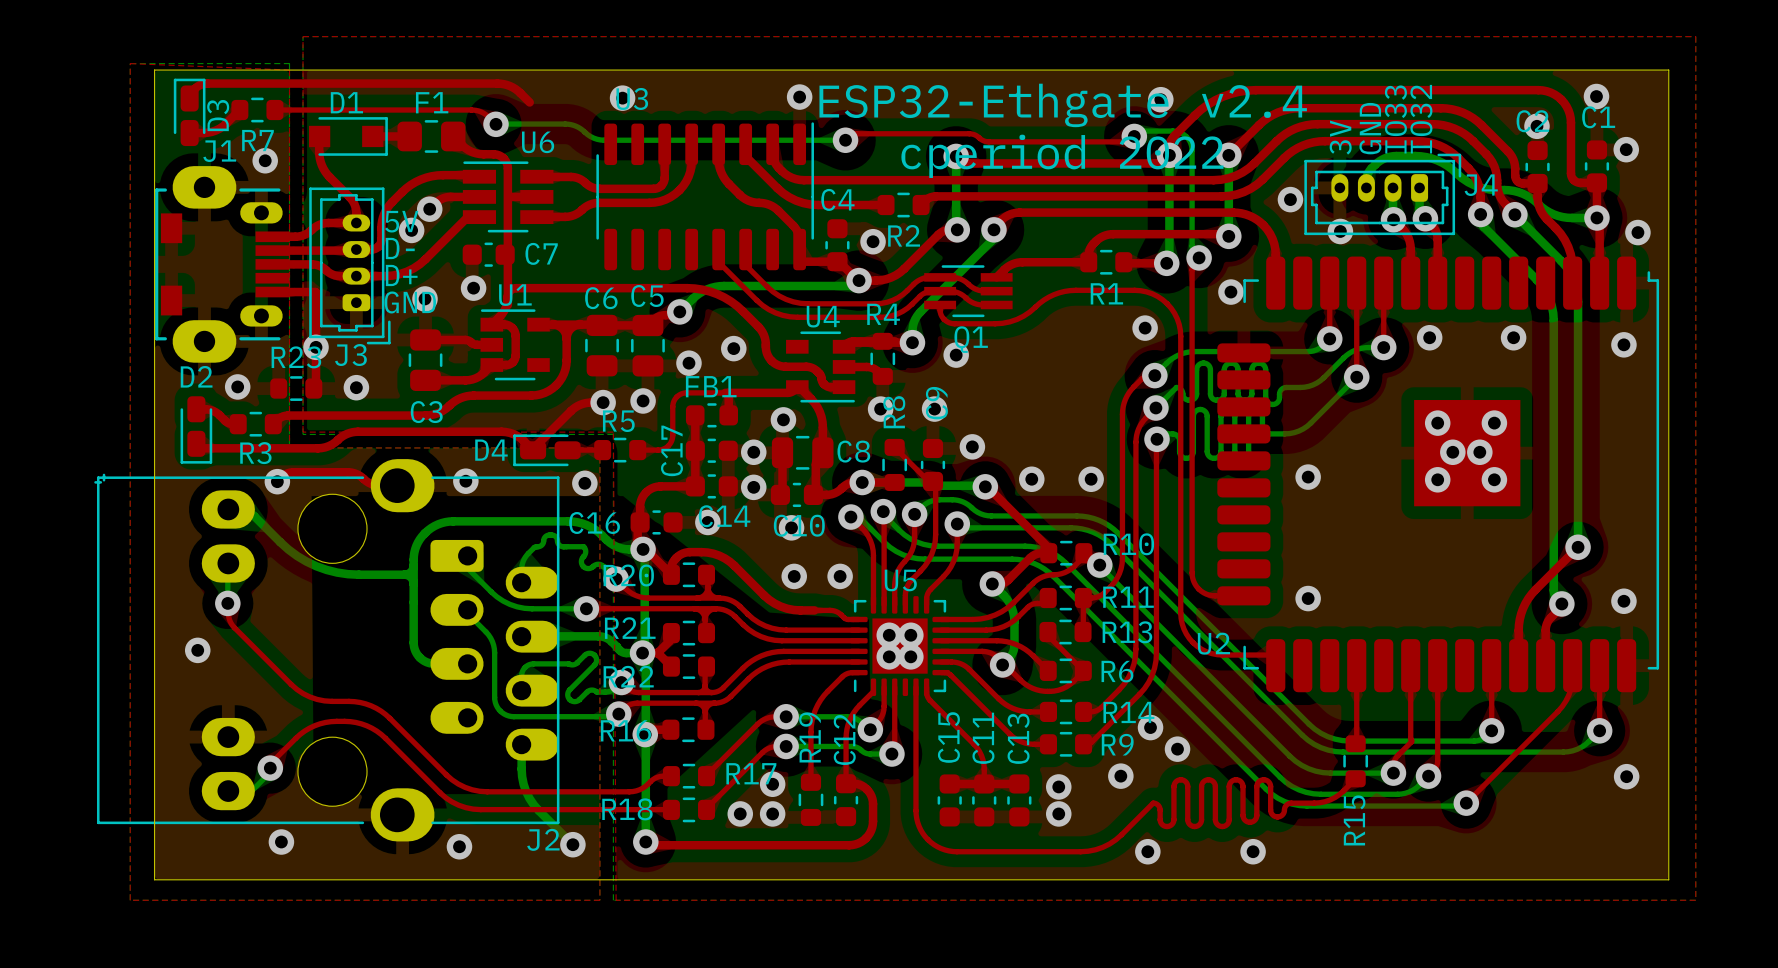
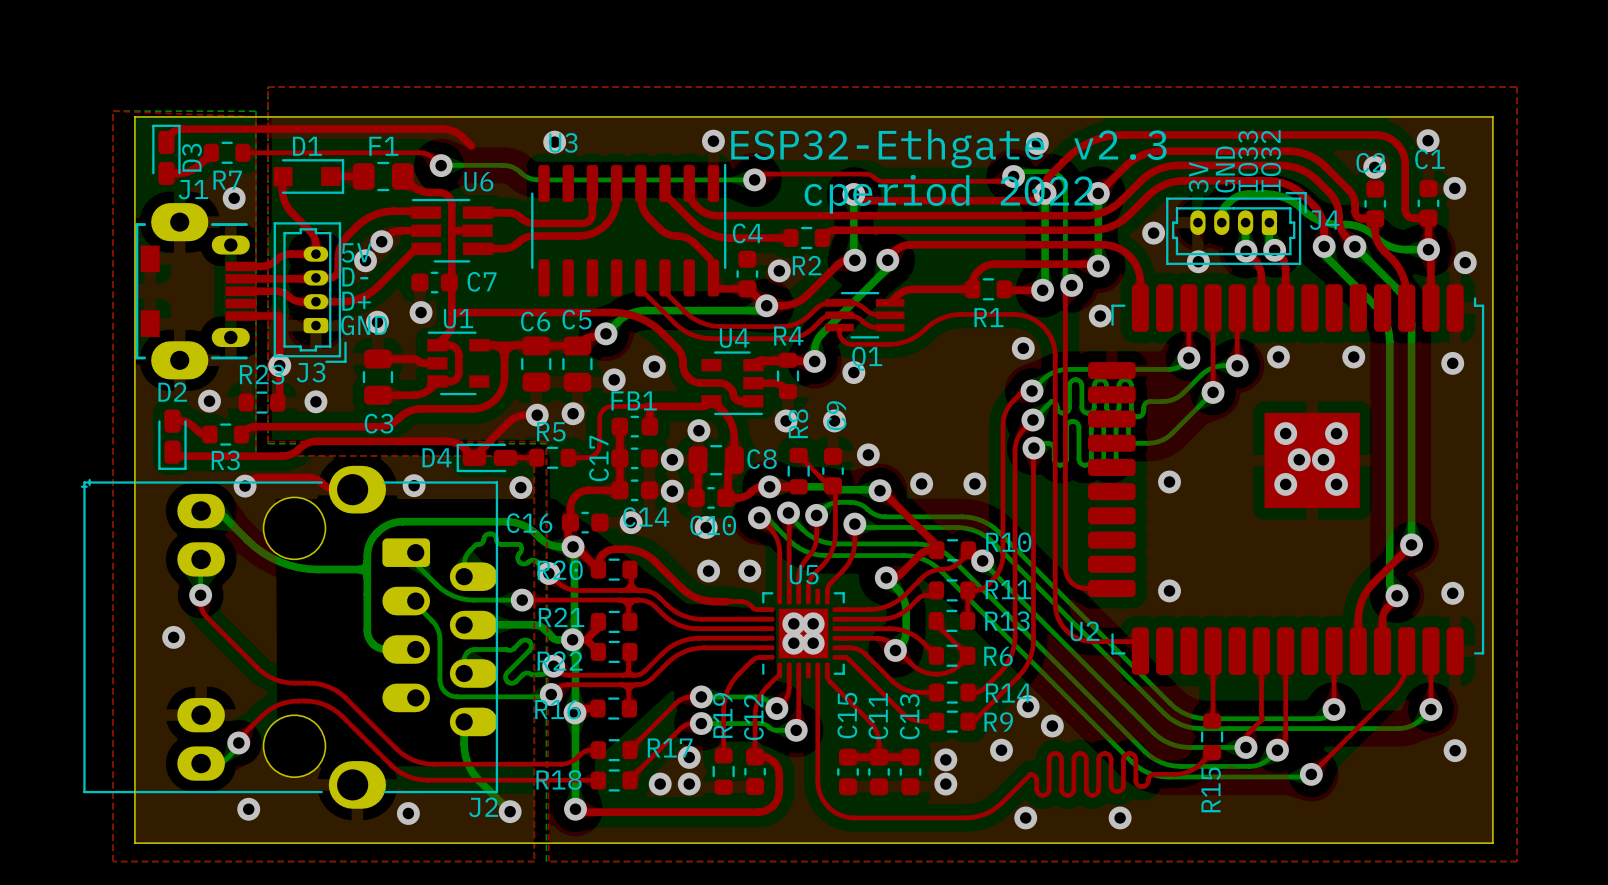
text: ESP32-Ethgate v2.4 (1063, 105) -> ESP32-Ethgate v2.3 (948, 148)

